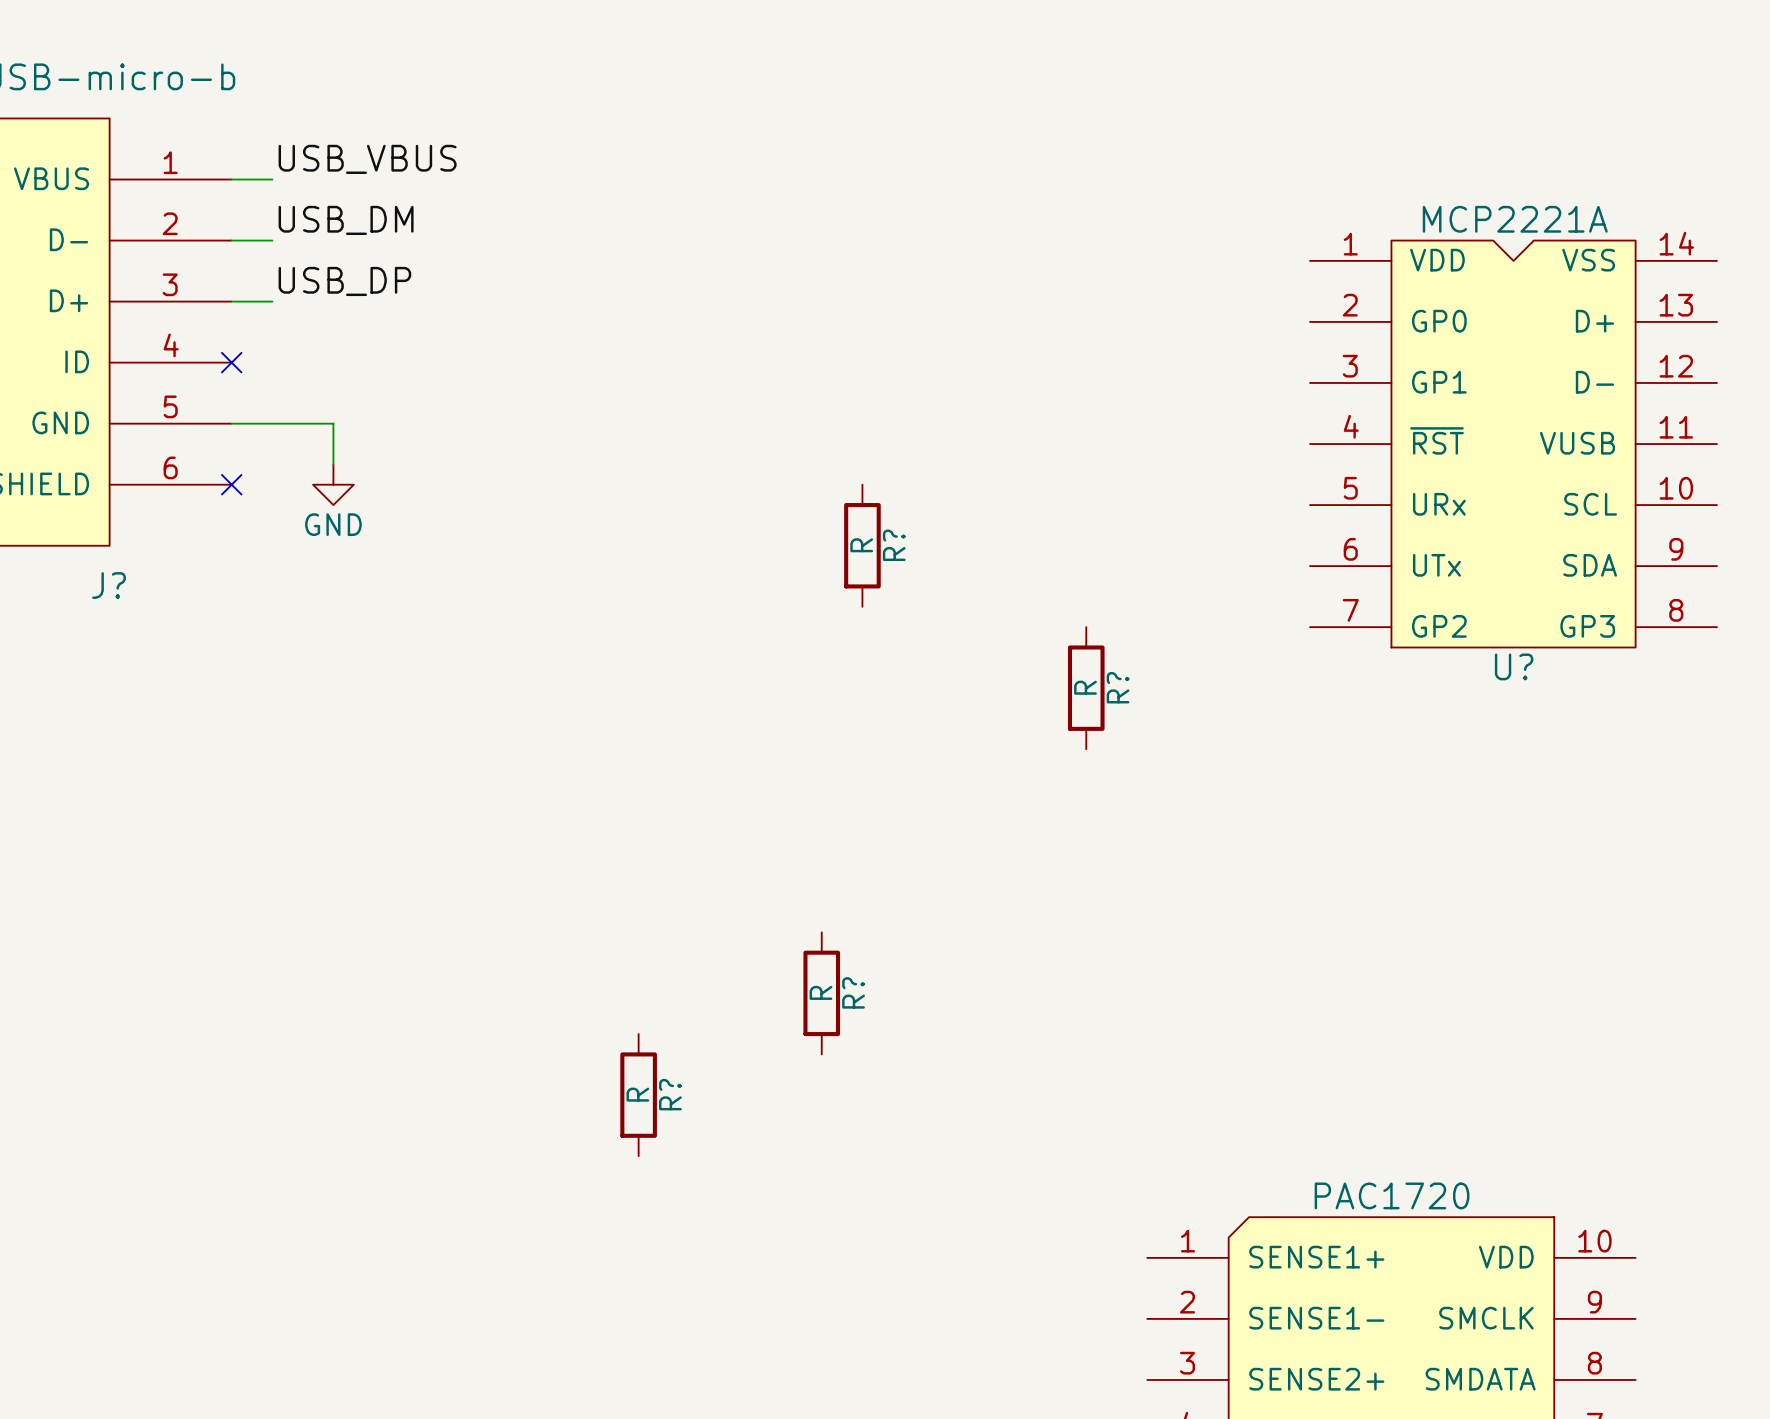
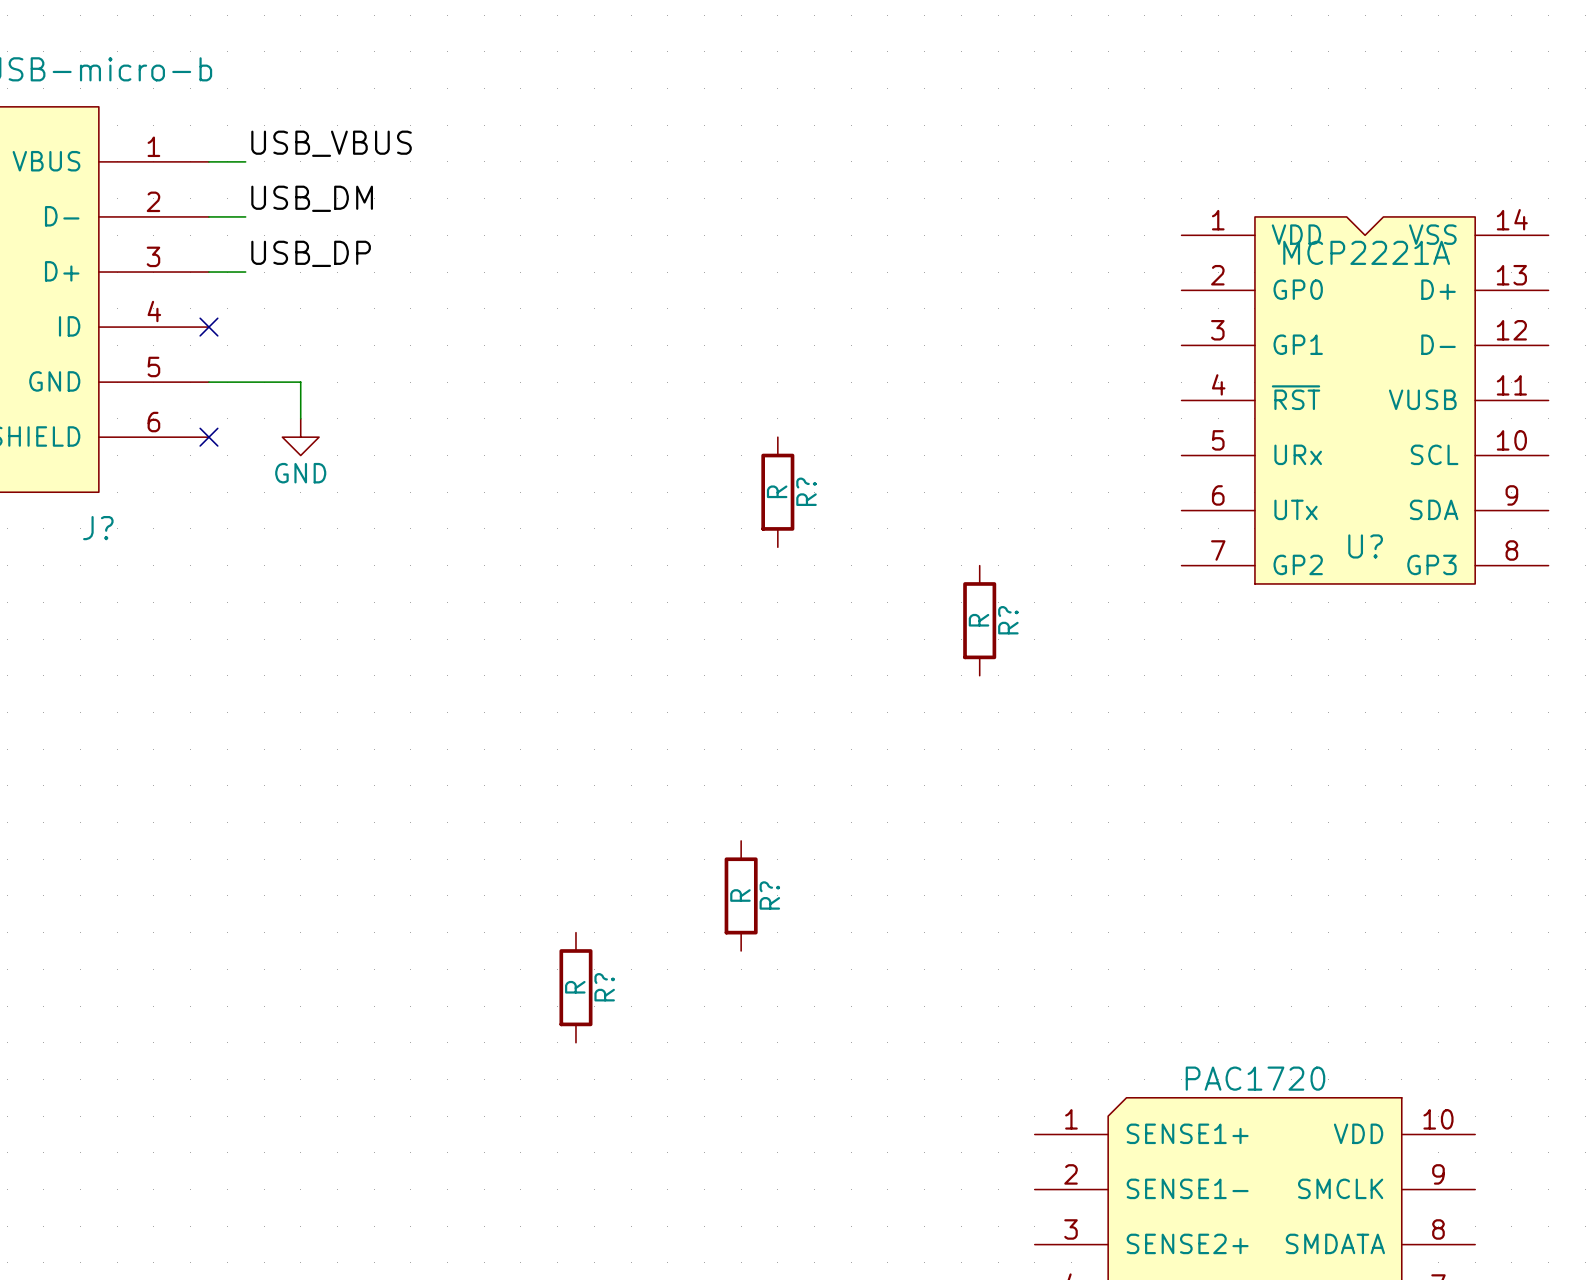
U? value position: MCP2221A (1515, 219) -> MCP2221A (1366, 252)
U? name position: U? (1514, 666) -> U? (1365, 546)

